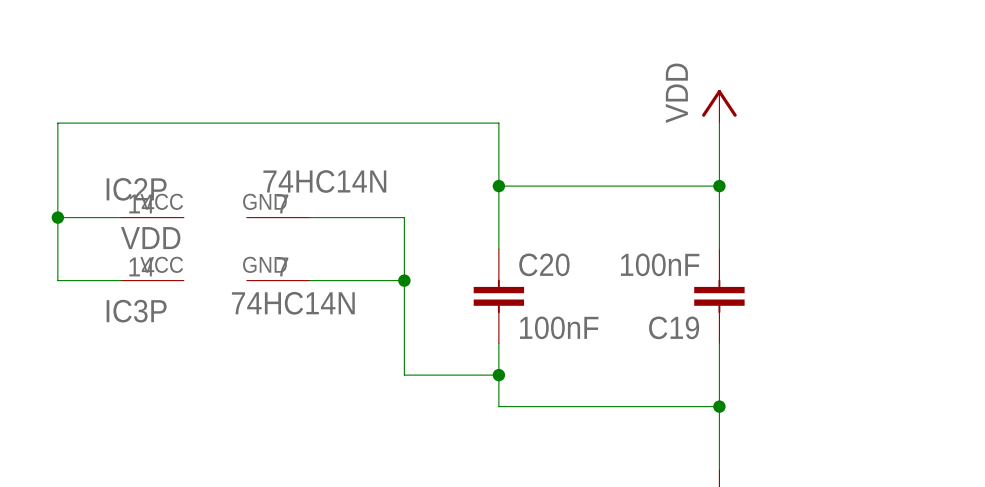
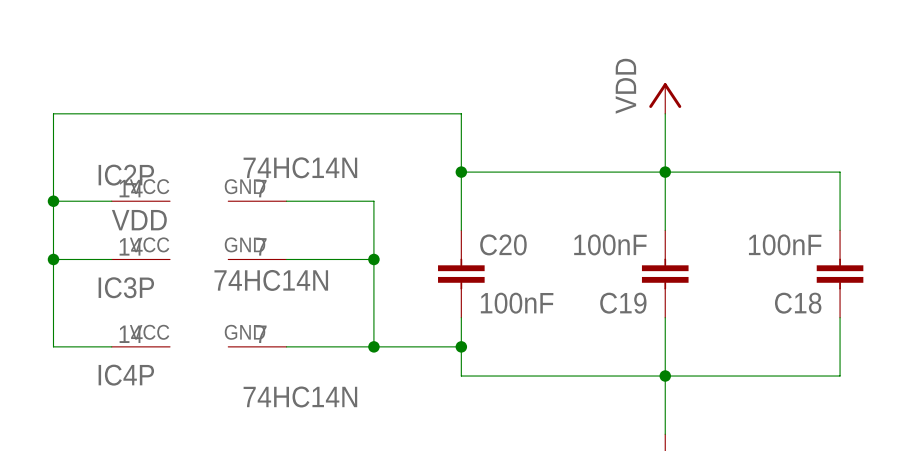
wire: none -> (665, 172) (840, 172) (840, 230)
wire: none -> (53, 259) (53, 346) (111, 346)
junction: none -> (53, 259)
C18: none -> 100nF (840, 274)
wire: none -> (840, 317) (840, 376) (665, 376)
IC4P: none -> 74HC14N (199, 346)
wire: none -> (286, 346) (373, 346)
junction: none -> (373, 346)

